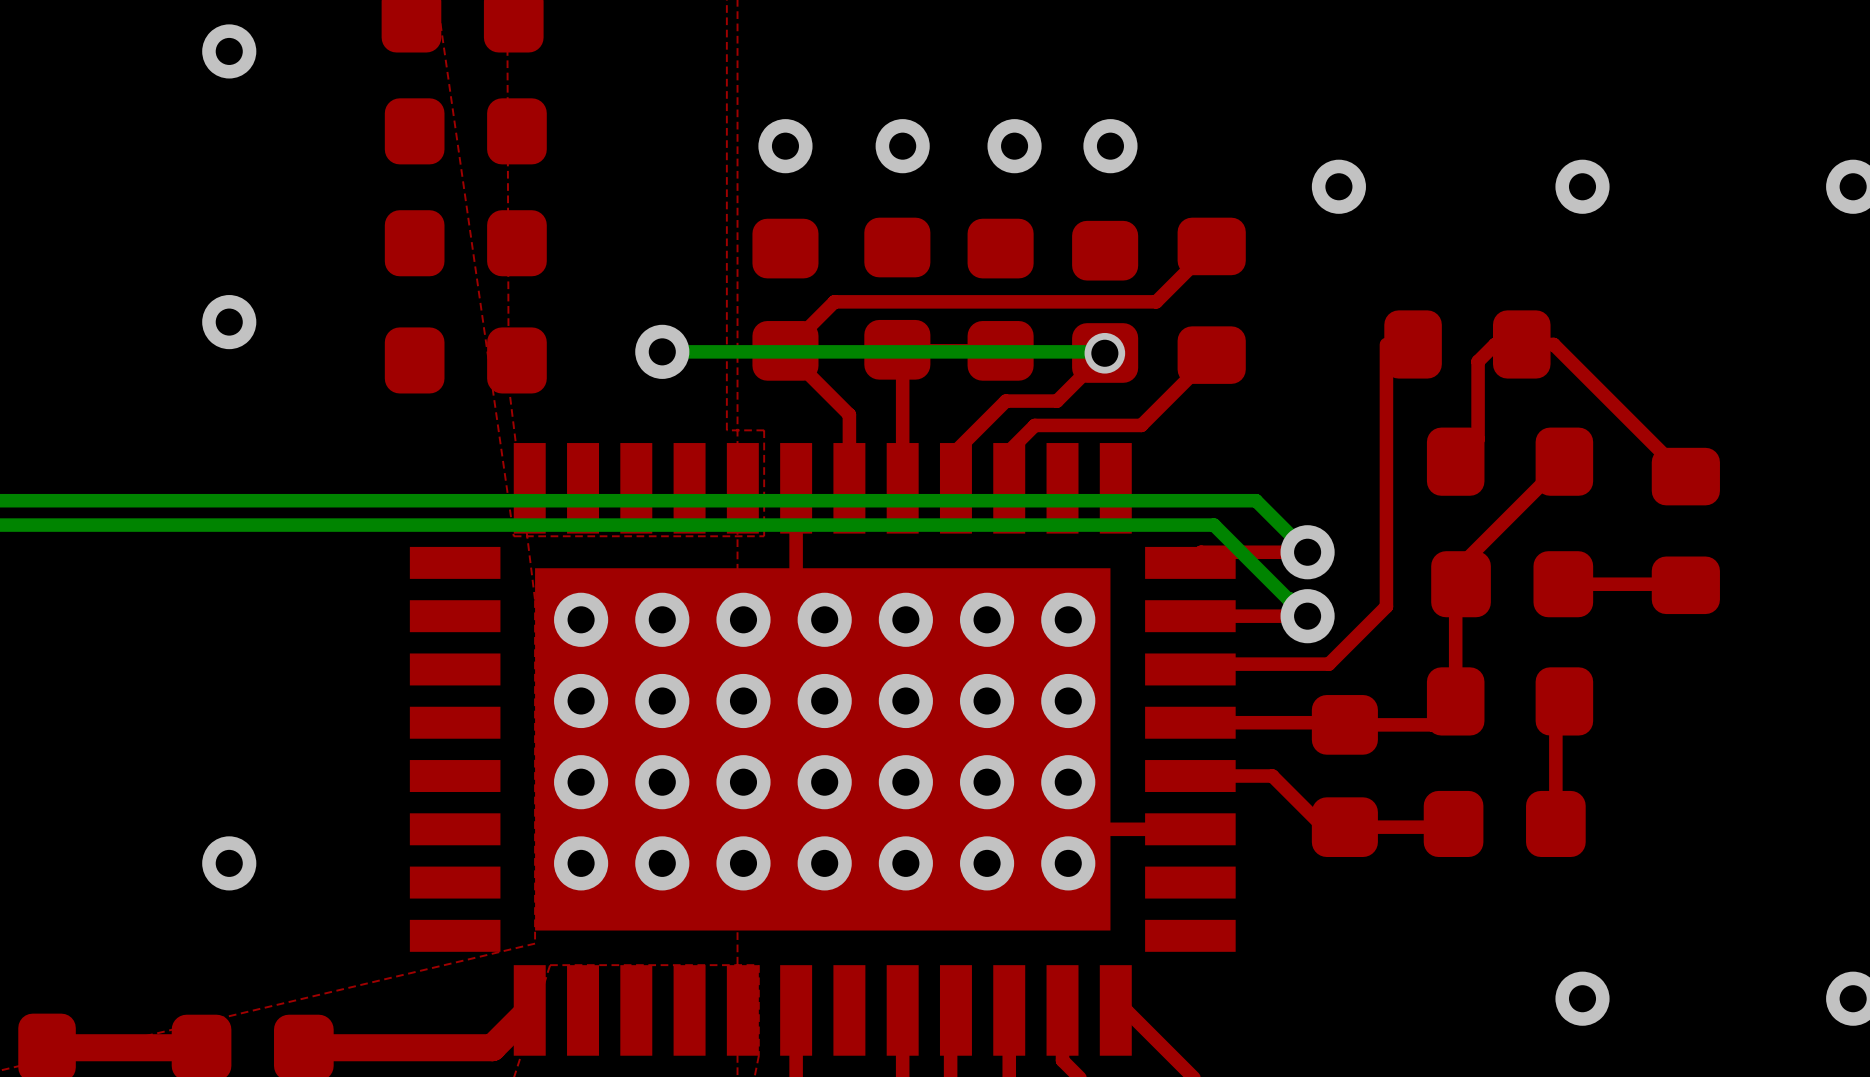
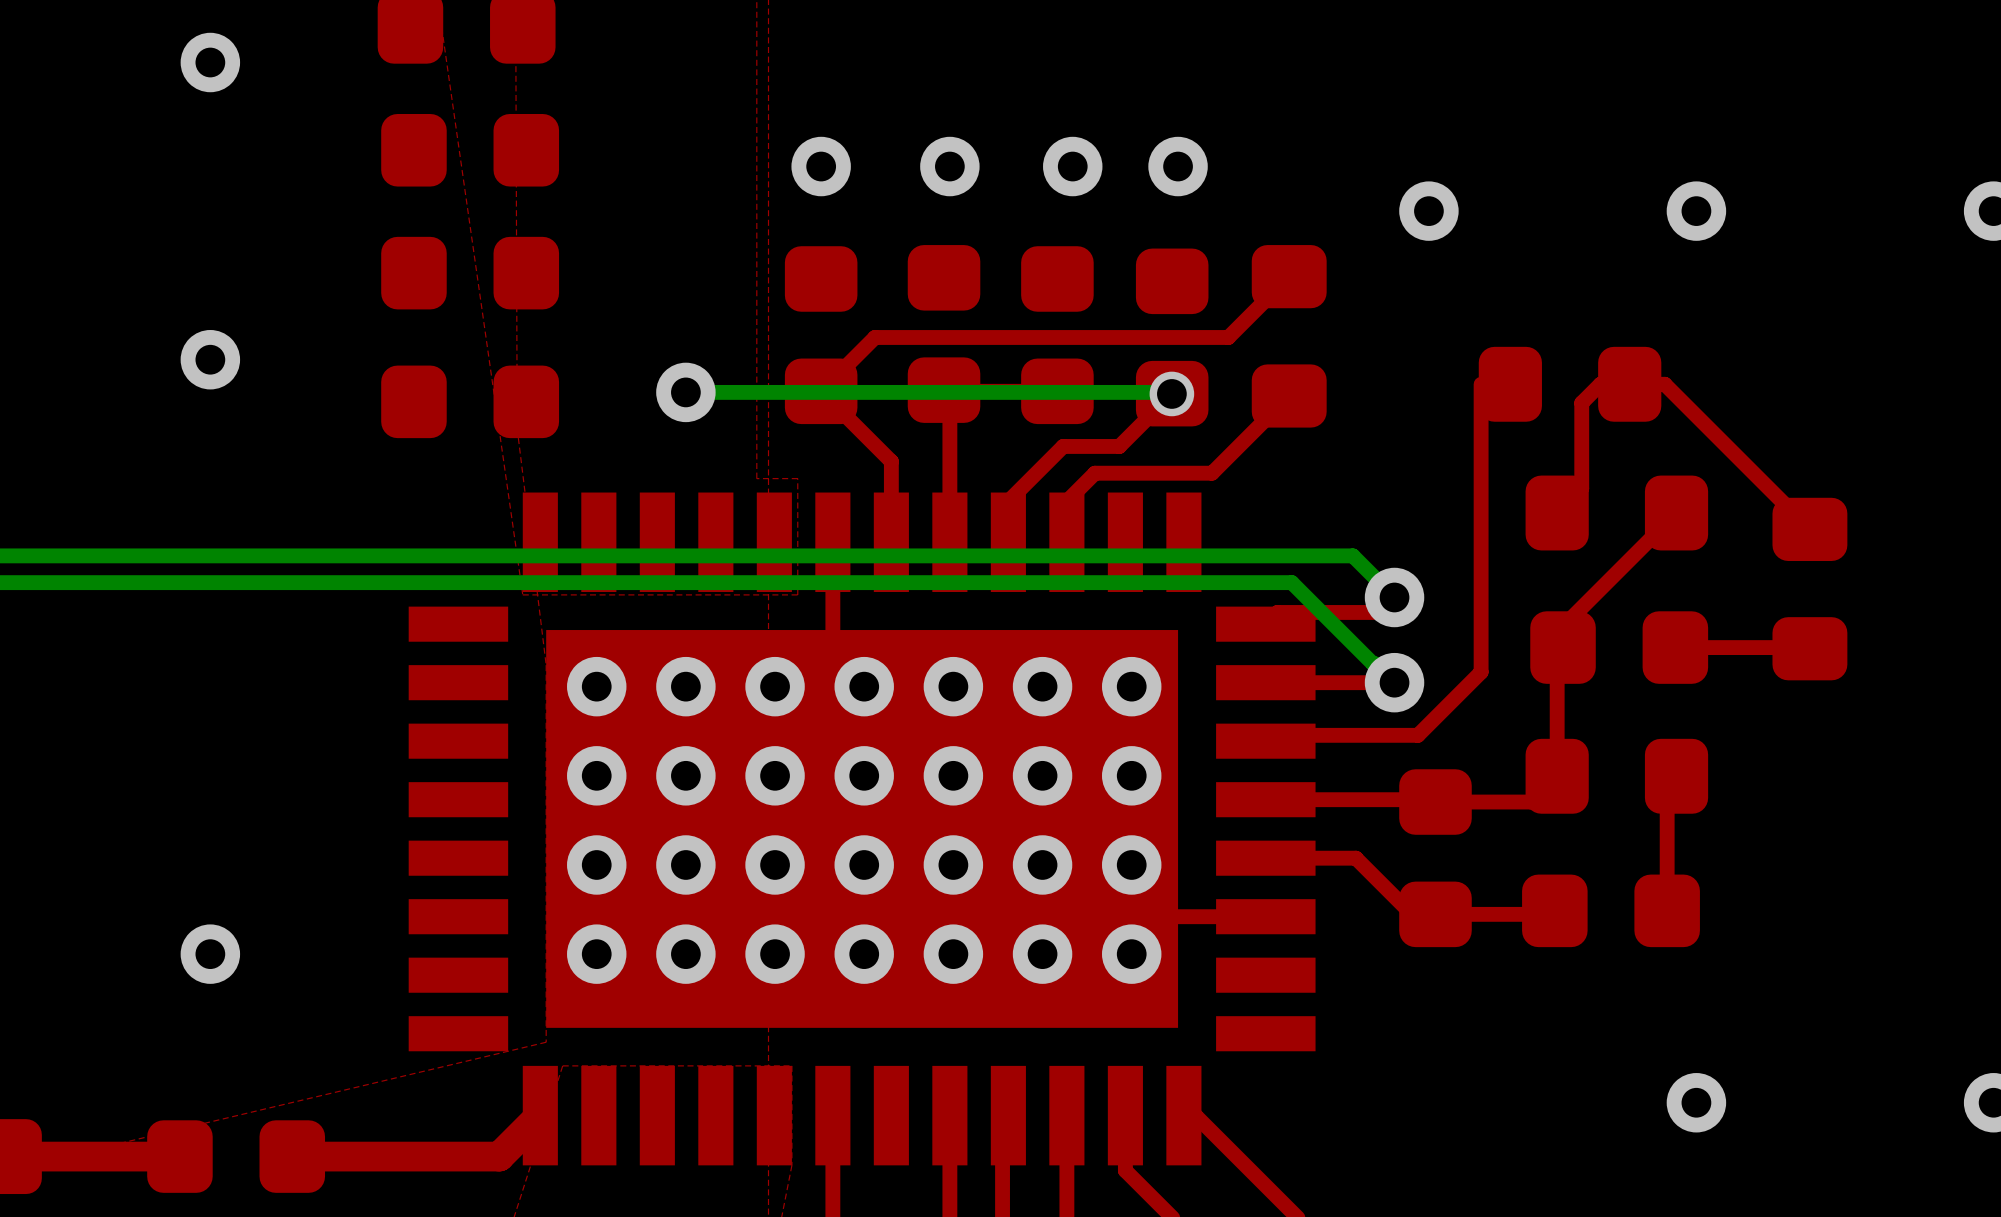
bottom track: (1256, 500) (1307, 552) -> (1337, 555) (1352, 555) (1394, 597)
via position: (1307, 552) -> (1394, 597)

